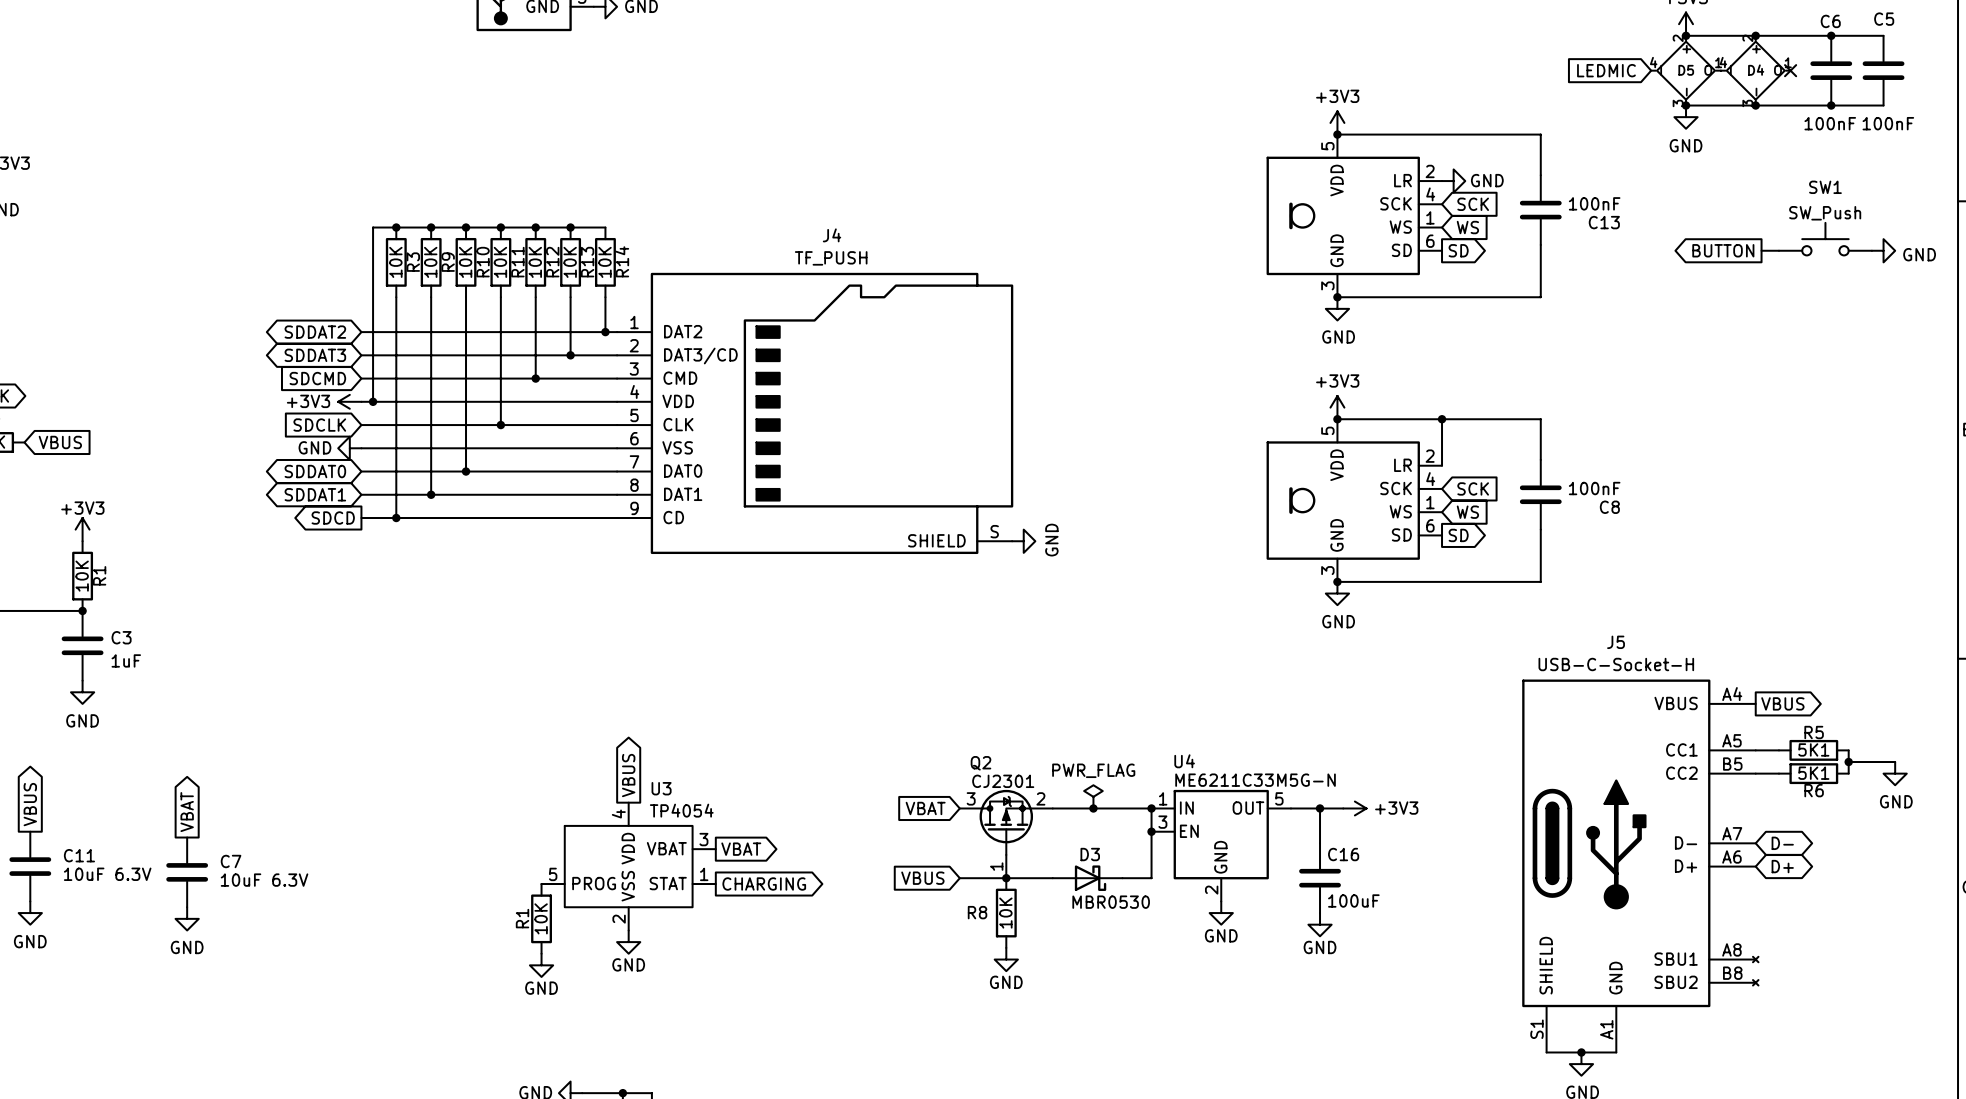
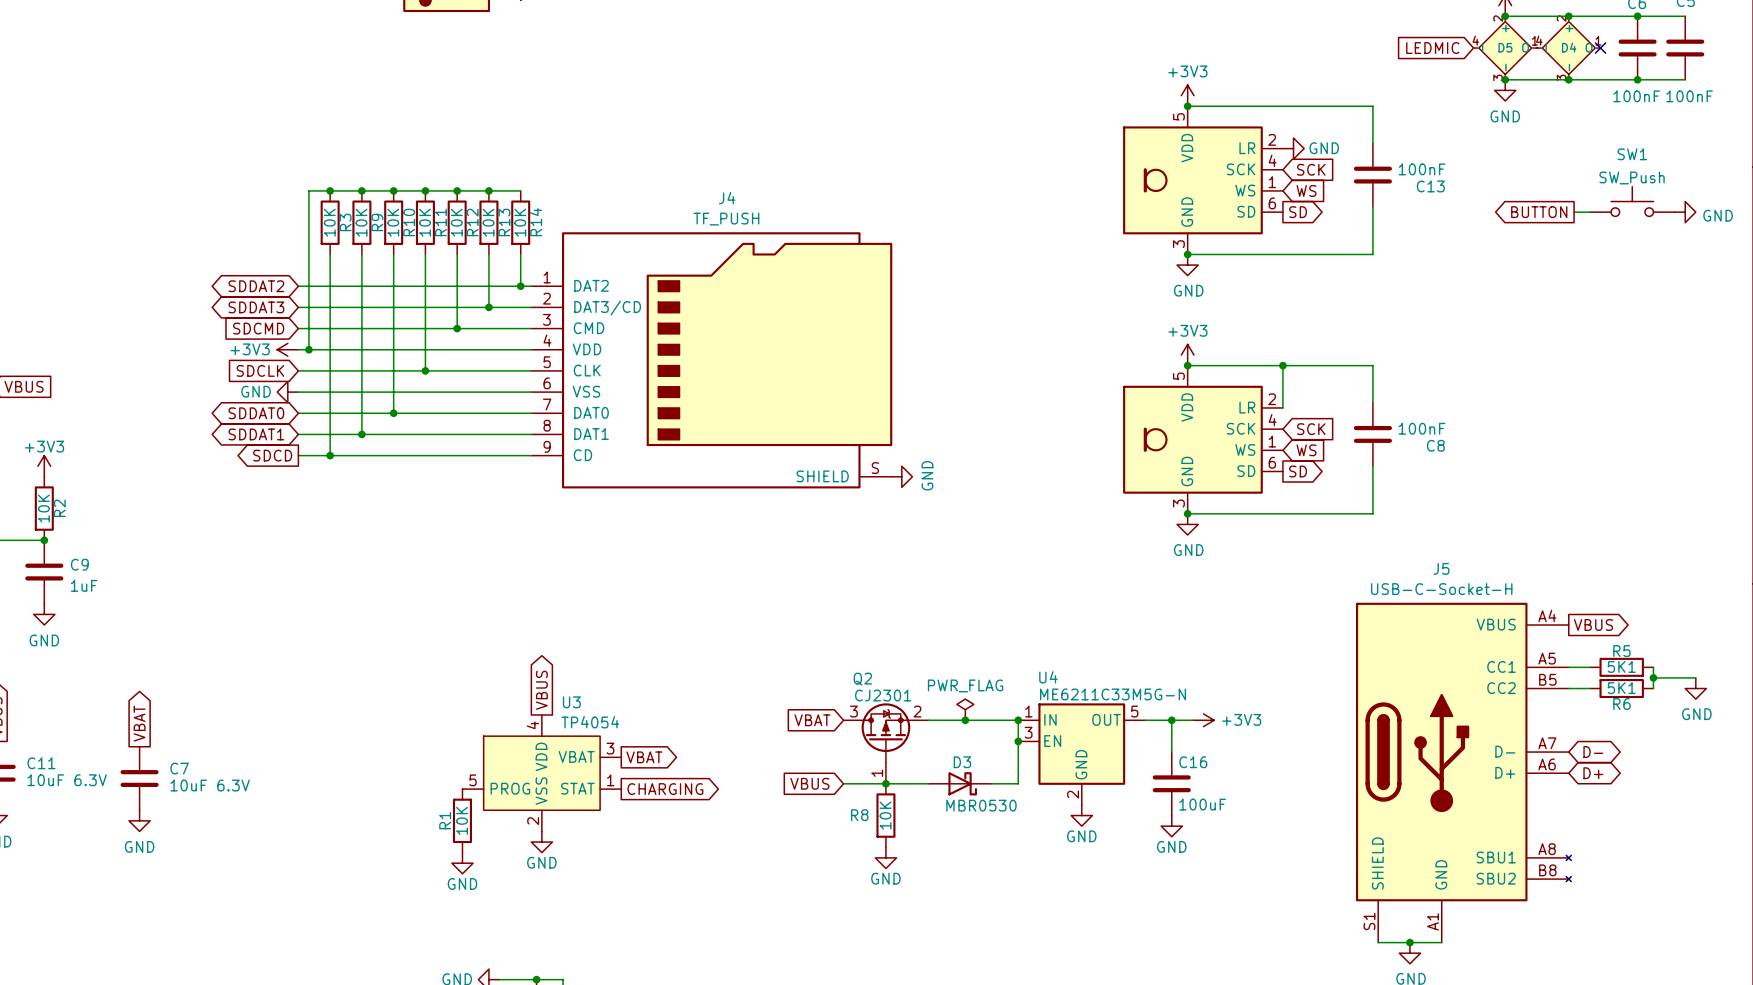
R1 name: R1 (99, 575) -> R2 (59, 508)
C3 name: C3 (121, 637) -> C9 (79, 564)

